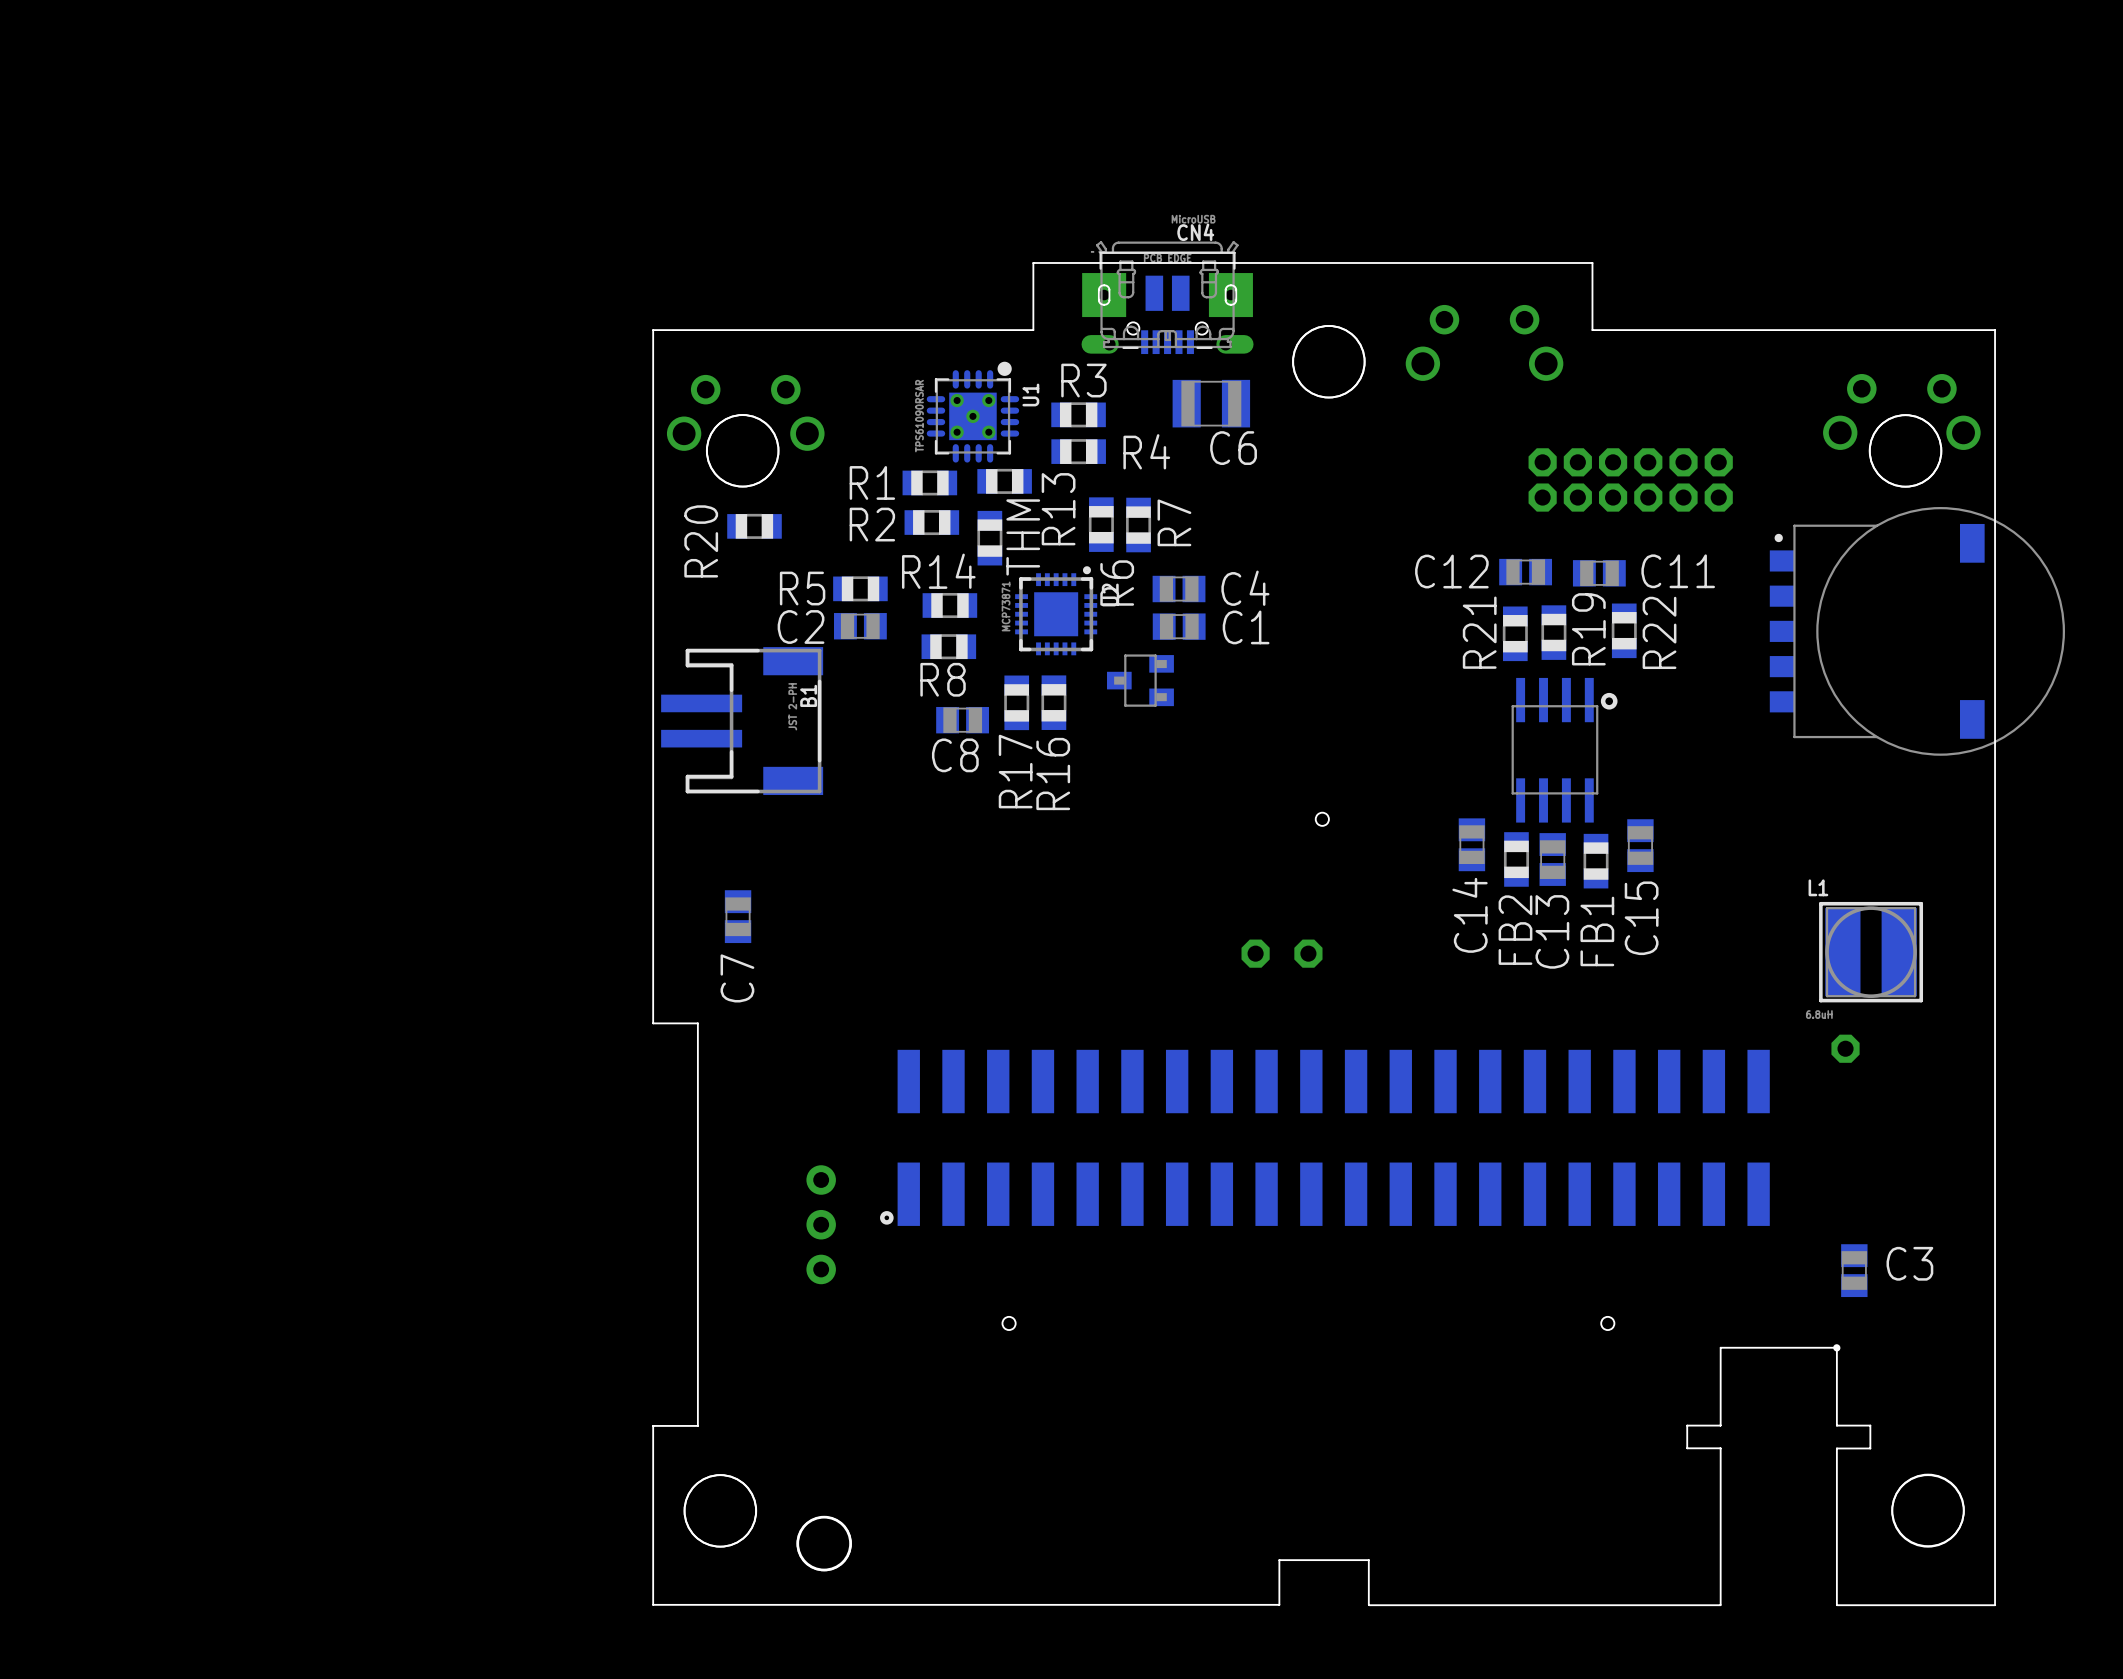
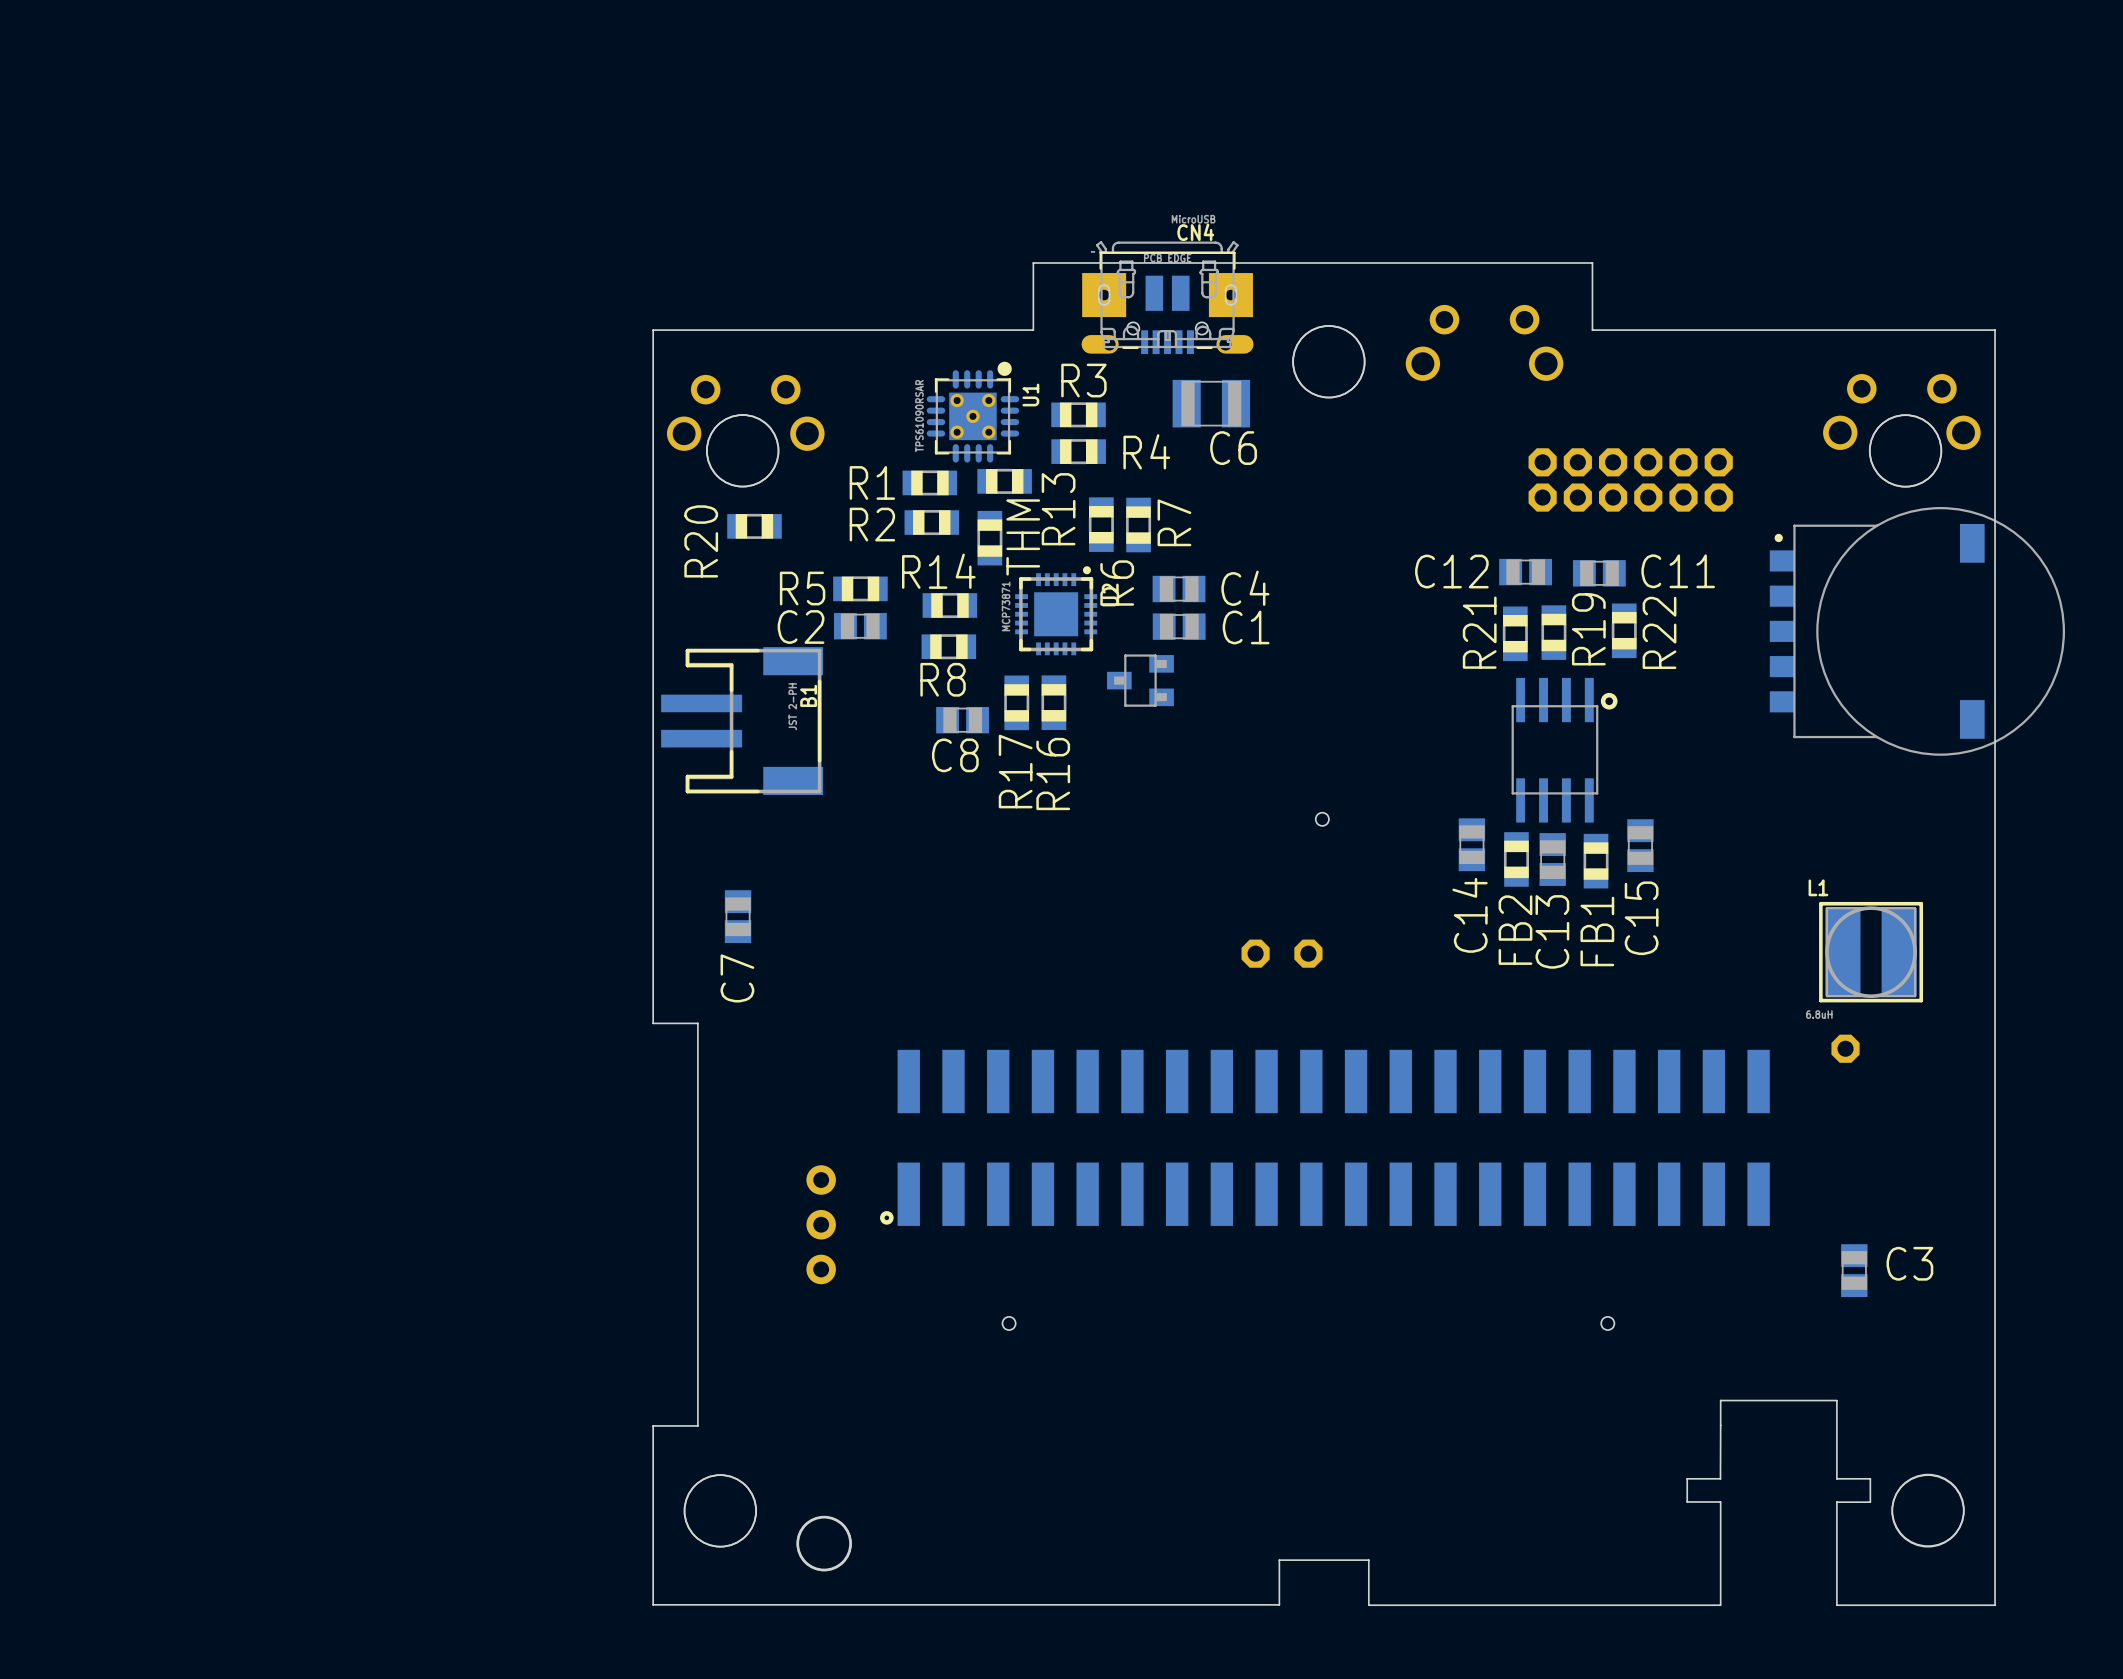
board edge: (1836, 1347) (1720, 1347) (1720, 1400) -> (1836, 1400) (1720, 1400)
board edge: (1836, 1347) (1836, 1400) -> none
board edge: (1720, 1425) (1687, 1425) (1687, 1448) (1720, 1448) -> none
board edge: (1836, 1425) (1870, 1425) (1870, 1448) (1836, 1448) -> (1836, 1425) (1836, 1448)
board edge: (1720, 1448) (1720, 1502) -> (1720, 1425) (1720, 1478) (1687, 1478) (1687, 1501) (1720, 1501)
board edge: (1836, 1478) (1836, 1502) -> (1836, 1478) (1870, 1478) (1870, 1502) (1836, 1502)

